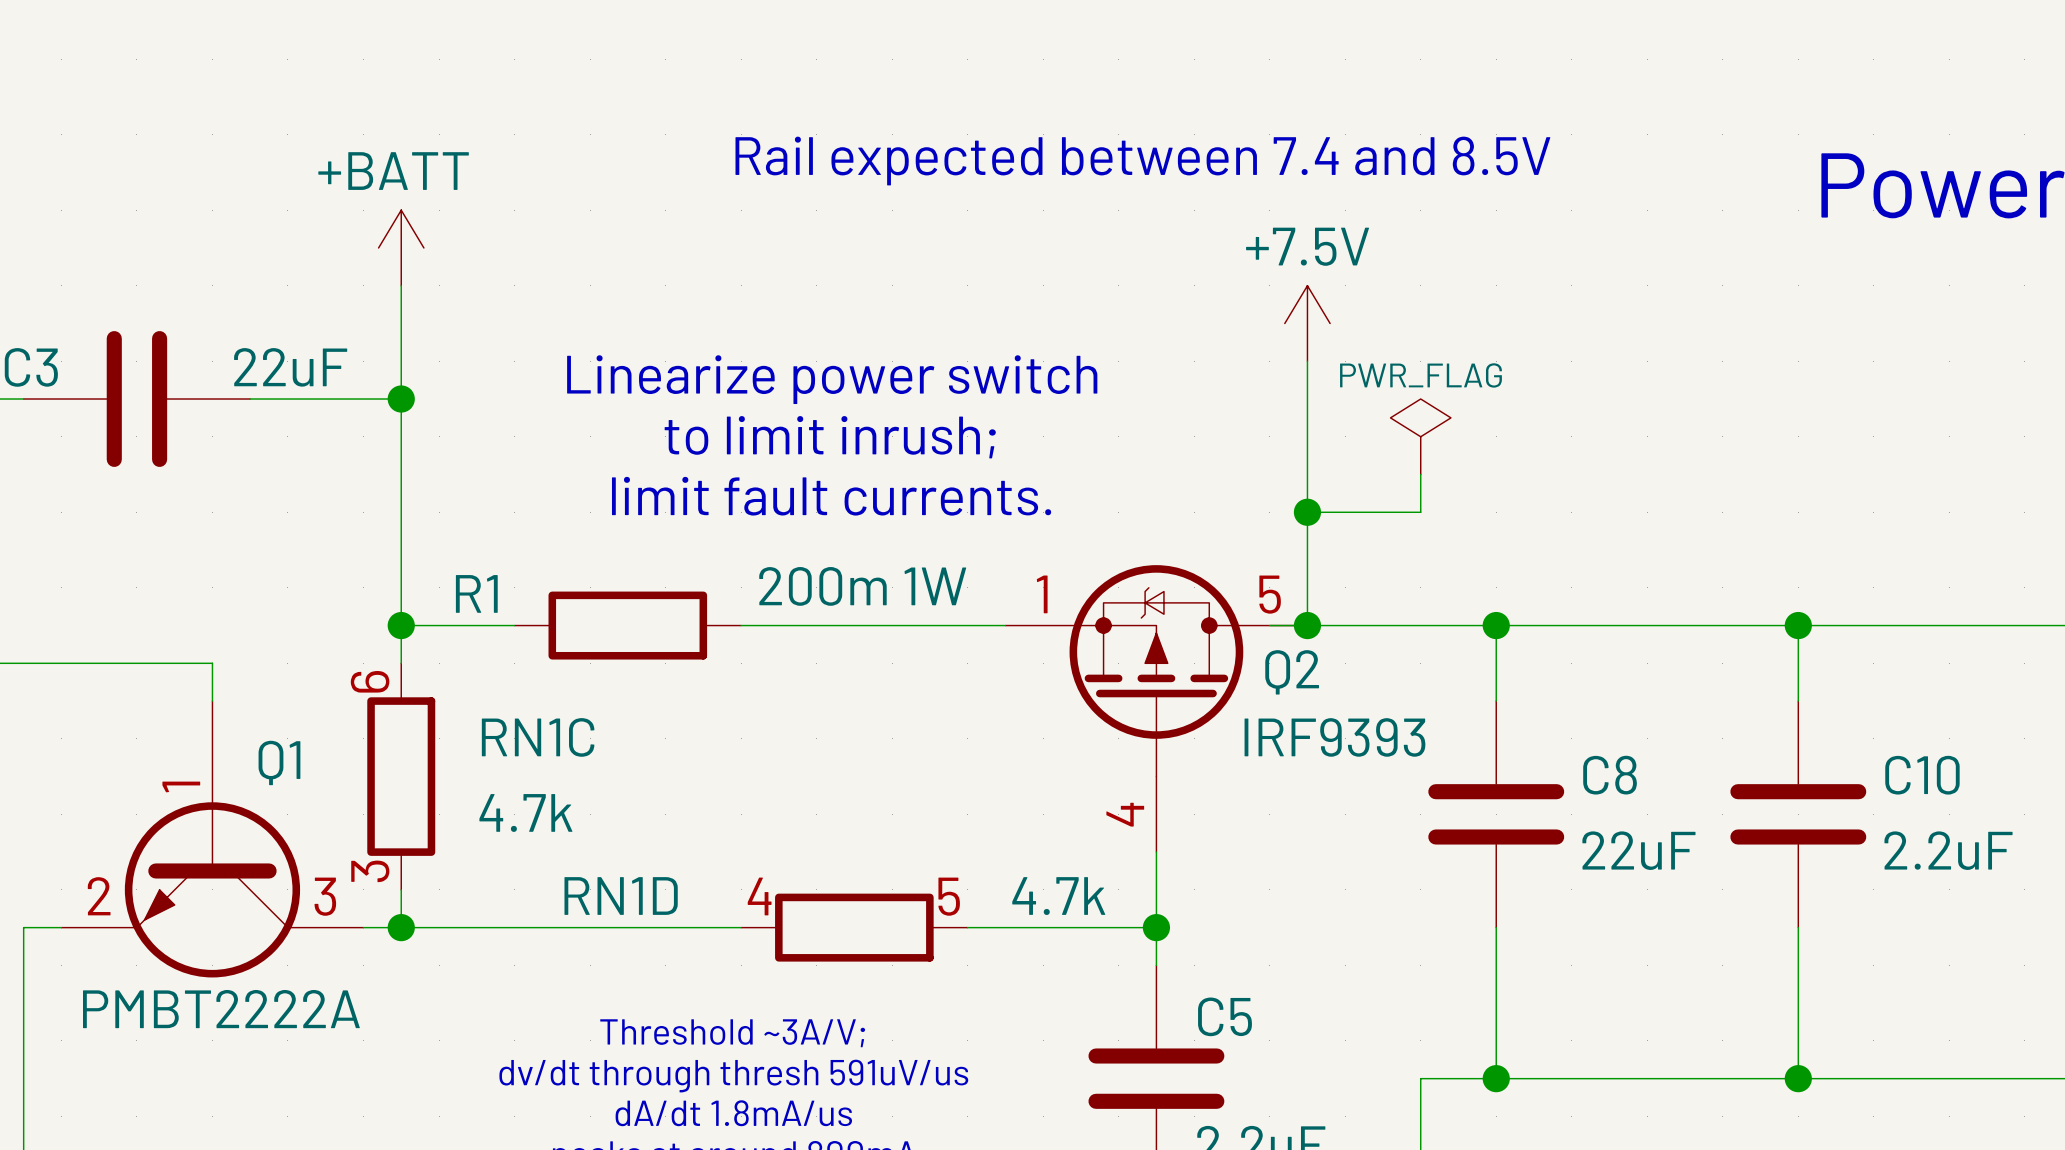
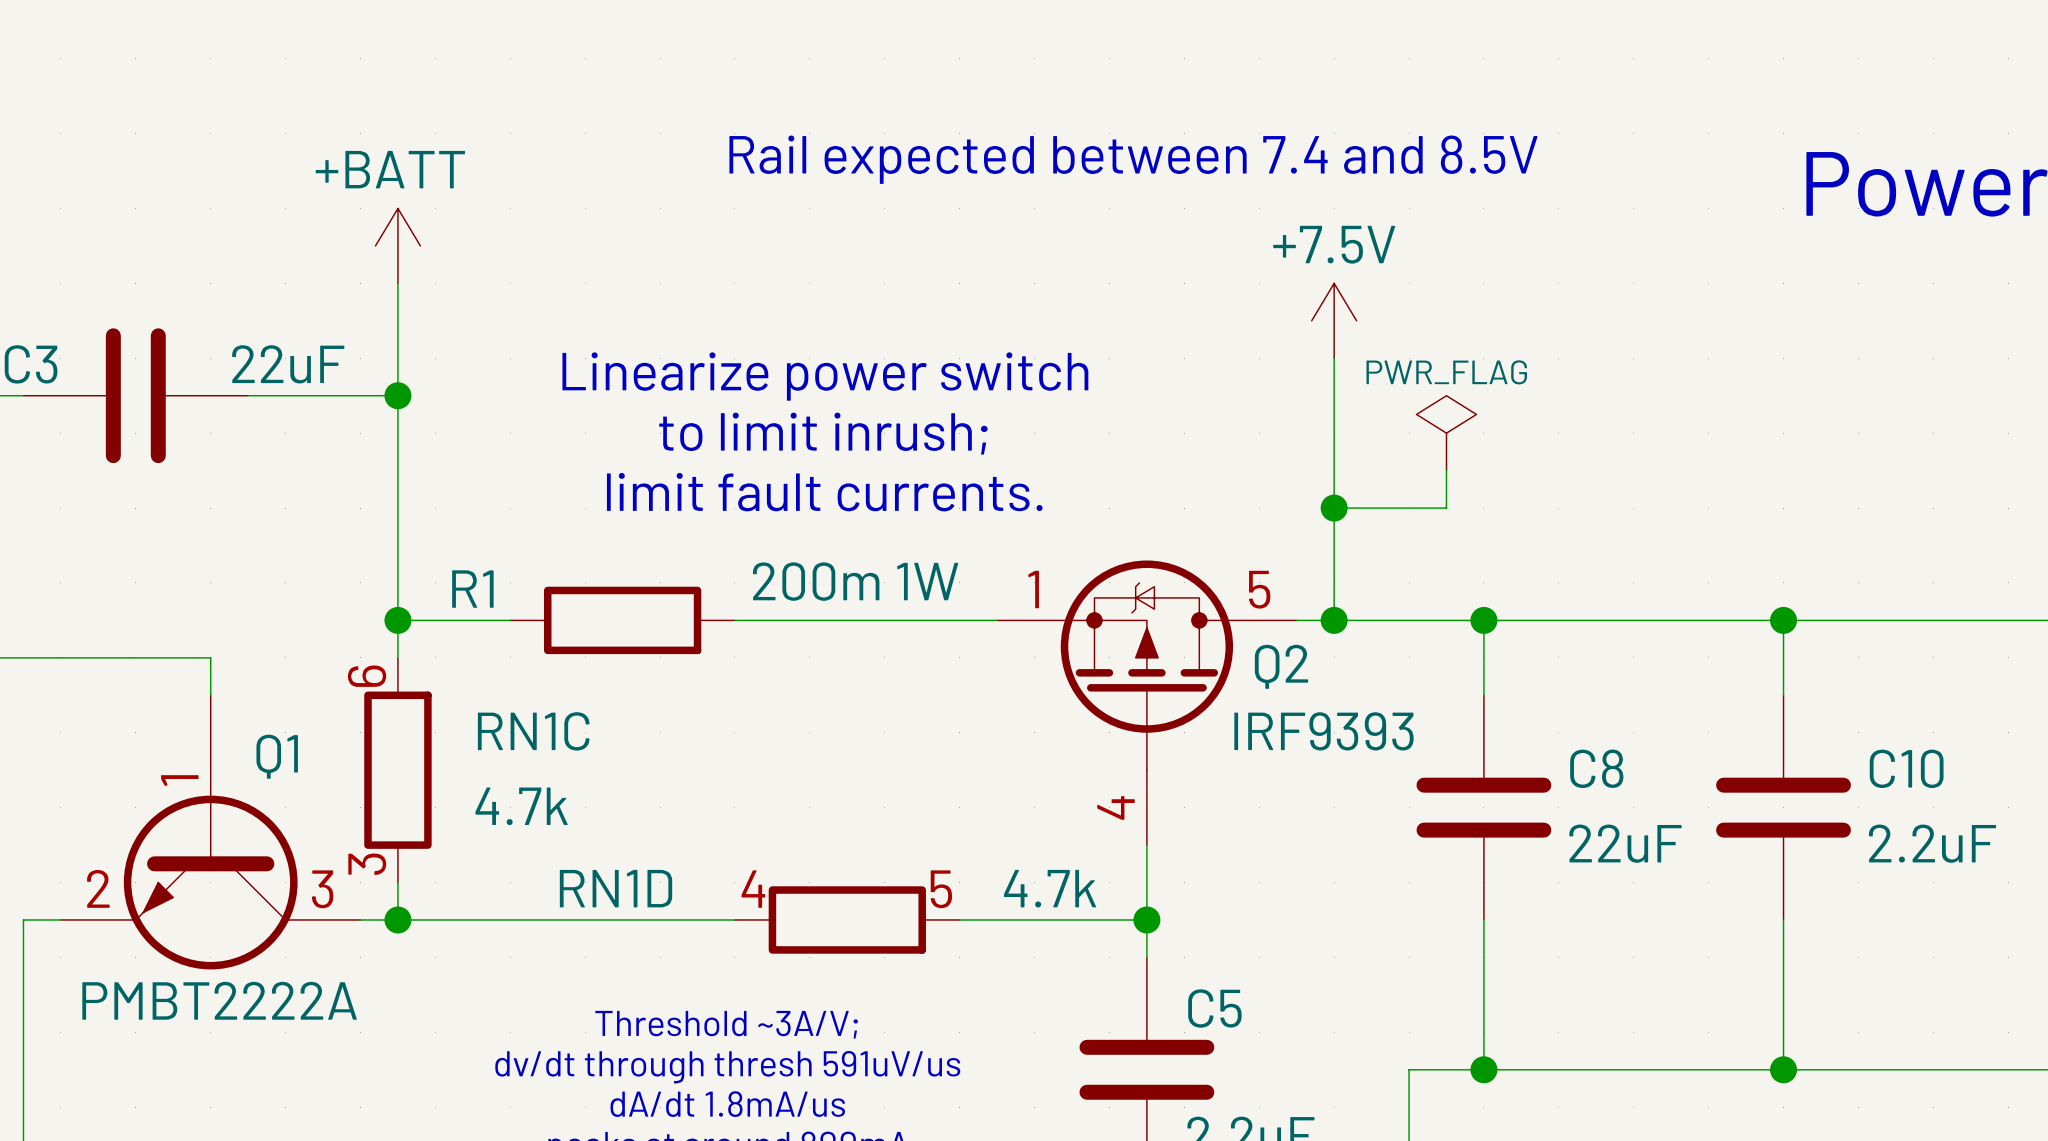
power symbol position: +7.5V (1307, 323) -> +7.5V (1334, 320)
wire: (1307, 361) (1307, 625) (1269, 625) -> none
wire: none -> (1334, 358) (1334, 620)
power symbol position: PWR_FLAG (1420, 436) -> PWR_FLAG (1446, 433)
wire: (1420, 474) (1420, 512) -> (1446, 470) (1446, 508) (1409, 508)
wire: (1307, 512) (1345, 512) -> none
junction position: (1307, 512) -> (1334, 508)
junction position: (1307, 625) -> (1334, 620)

